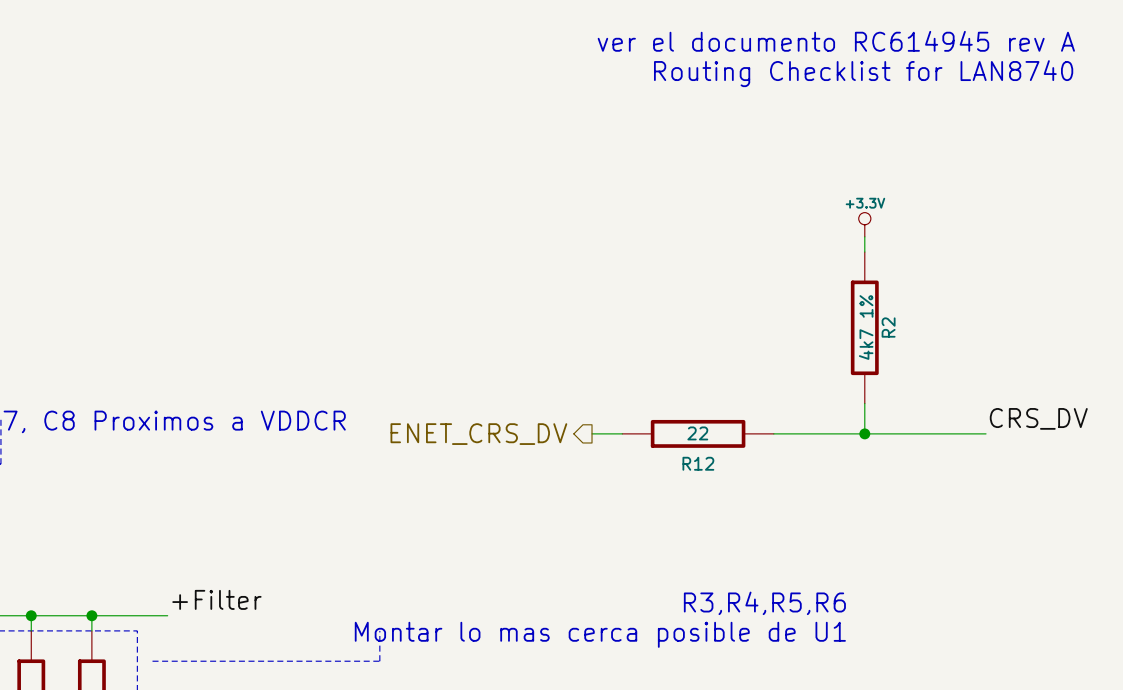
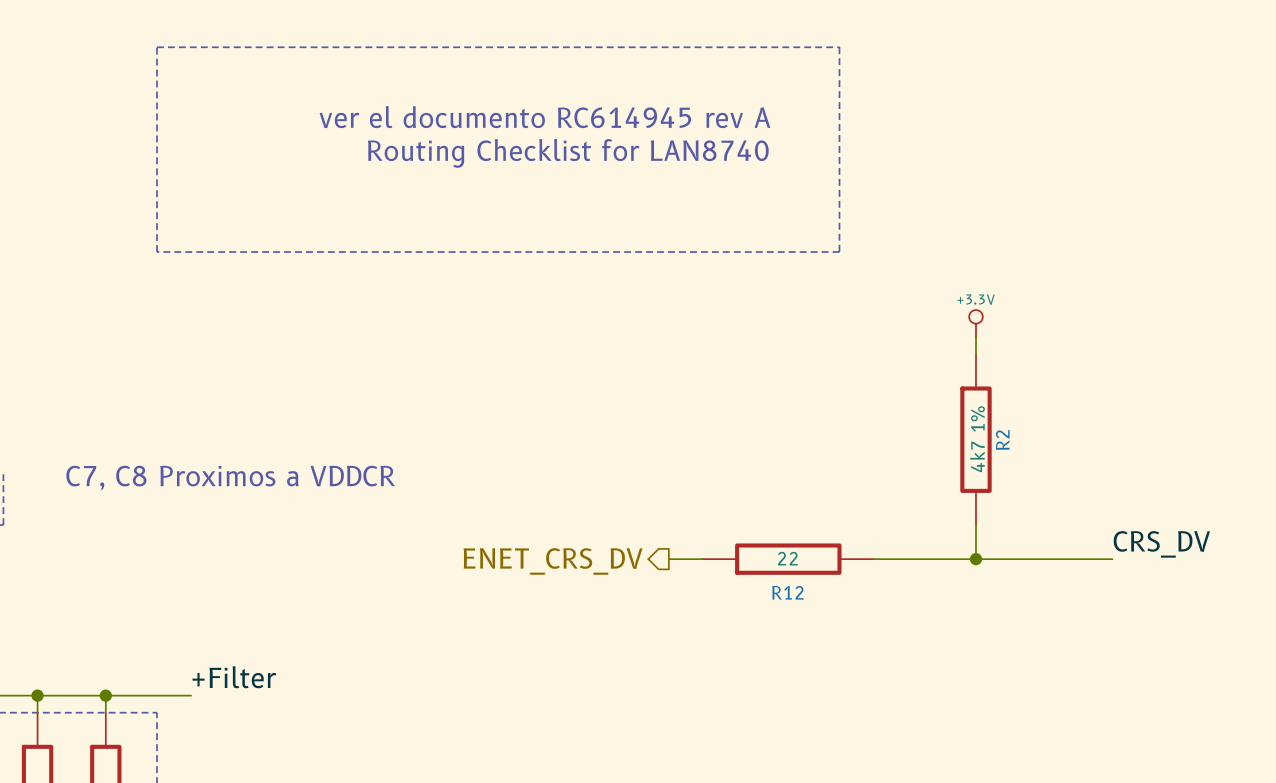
line: none -> (156, 47) (839, 47) (839, 252) (156, 252) (156, 47)
text: ver el documento RC614945 rev A (836, 41) -> none
text: Routing Checklist for LAN8740 (863, 73) -> none
text: none -> ver el documento RC614945 rev A (544, 117)
text: none -> Routing Checklist for LAN8740 (568, 153)
power symbol position: +3.3V (864, 224) -> +3.3V (975, 323)
wire: (864, 236) (864, 252) -> (975, 337) (975, 354)
R2 position: (864, 327) -> (975, 439)
wire: (864, 403) (864, 433) -> (975, 525) (975, 559)
label position: CRS_DV (1038, 418) -> CRS_DV (1161, 544)
wire: (592, 433) (622, 433) -> (668, 559) (702, 559)
R12 position: (698, 433) -> (788, 559)
wire: (773, 433) (986, 433) -> (873, 559) (1112, 559)
junction position: (864, 433) -> (975, 559)
hierarchical label position: ENET_CRS_DV (478, 434) -> ENET_CRS_DV (553, 561)
text: R3,R4,R5,R6 (764, 603) -> none
line: (379, 630) (379, 661) (152, 661) -> none
text: Montar lo mas cerca posible de U1 (600, 634) -> none

